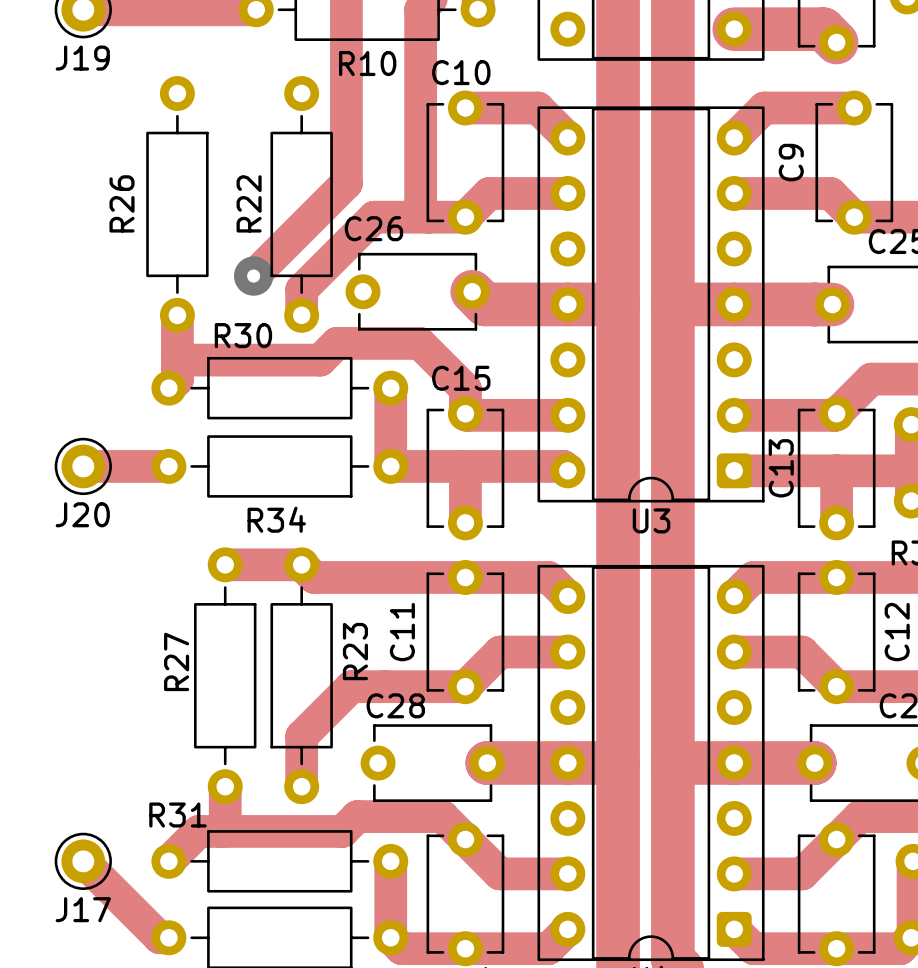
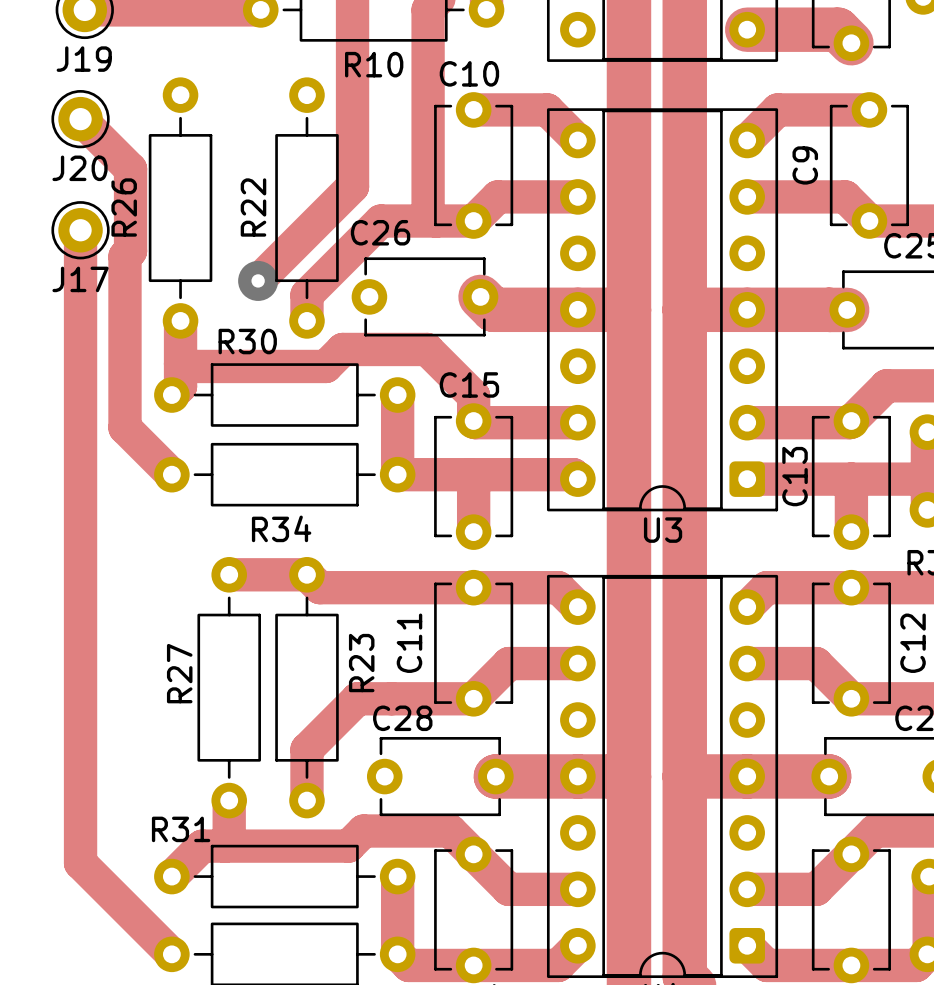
track: (83, 466) (168, 466) -> (80, 119) (130, 169) (130, 250) (124, 256) (124, 427) (171, 474)
J20 position: (83, 466) -> (80, 119)
track: (83, 861) (159, 937) (168, 937) -> (80, 230) (80, 863) (171, 954)
J17 position: (83, 861) -> (80, 230)

